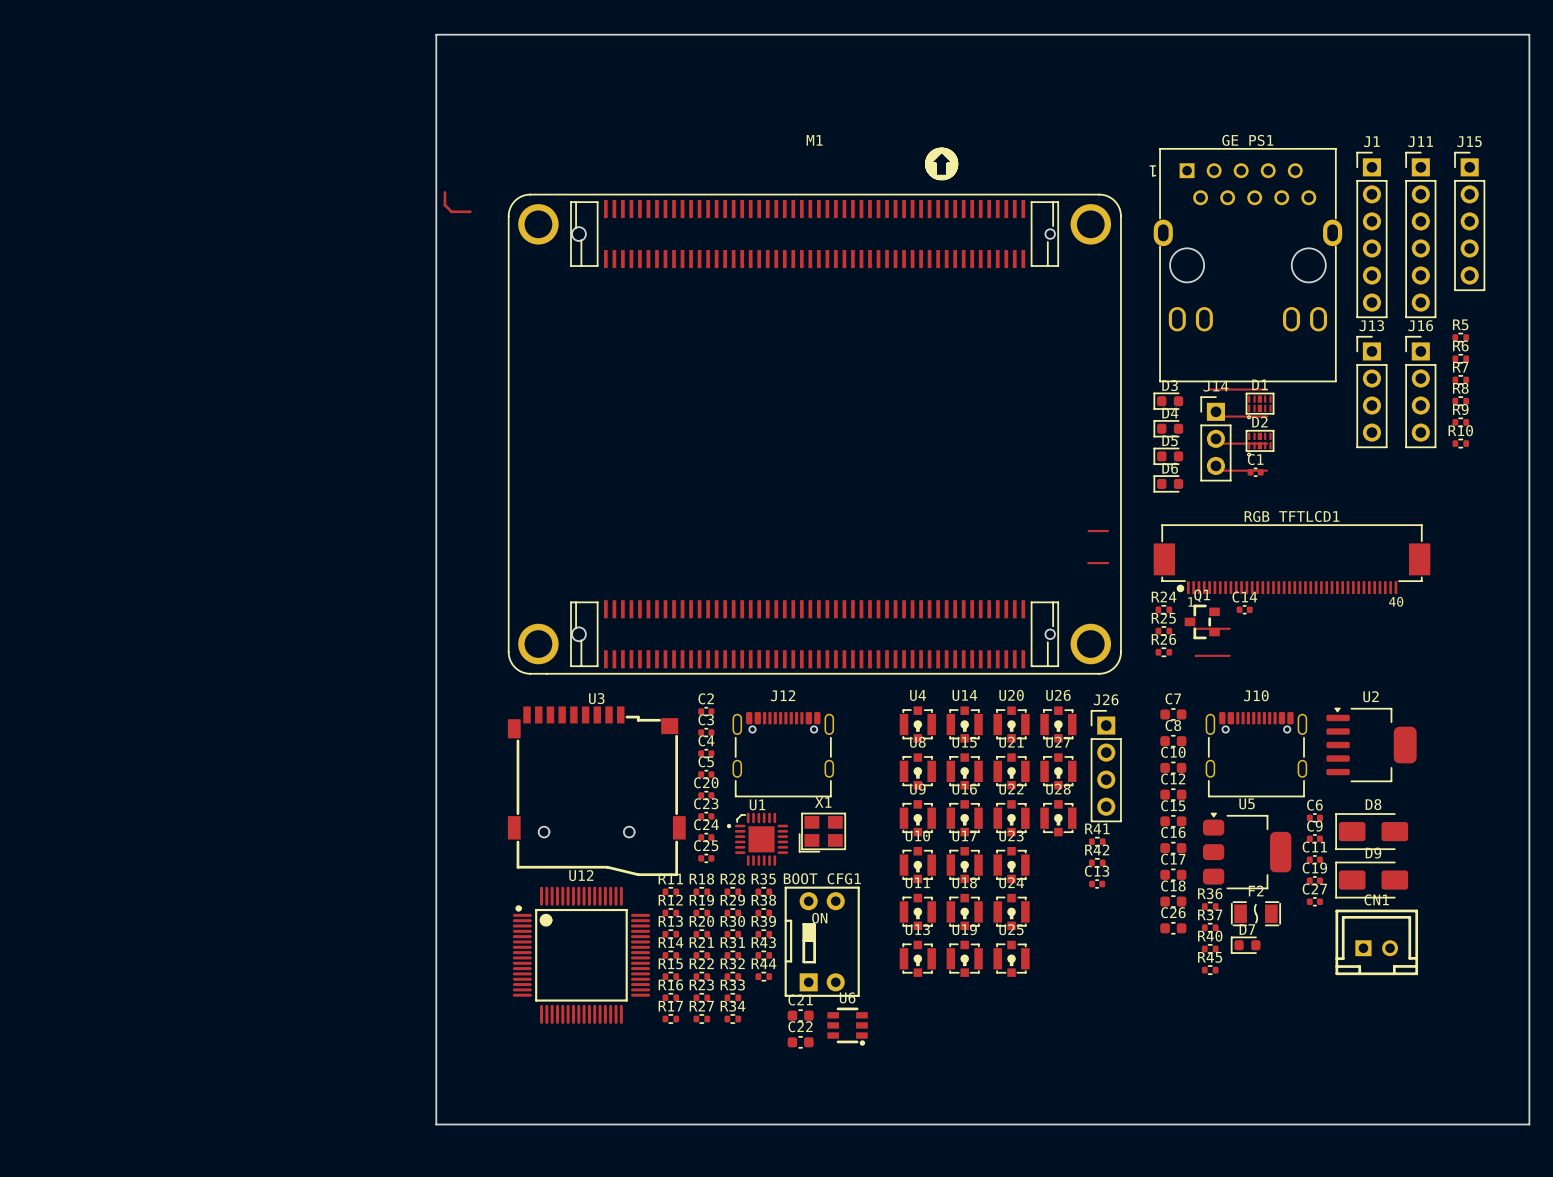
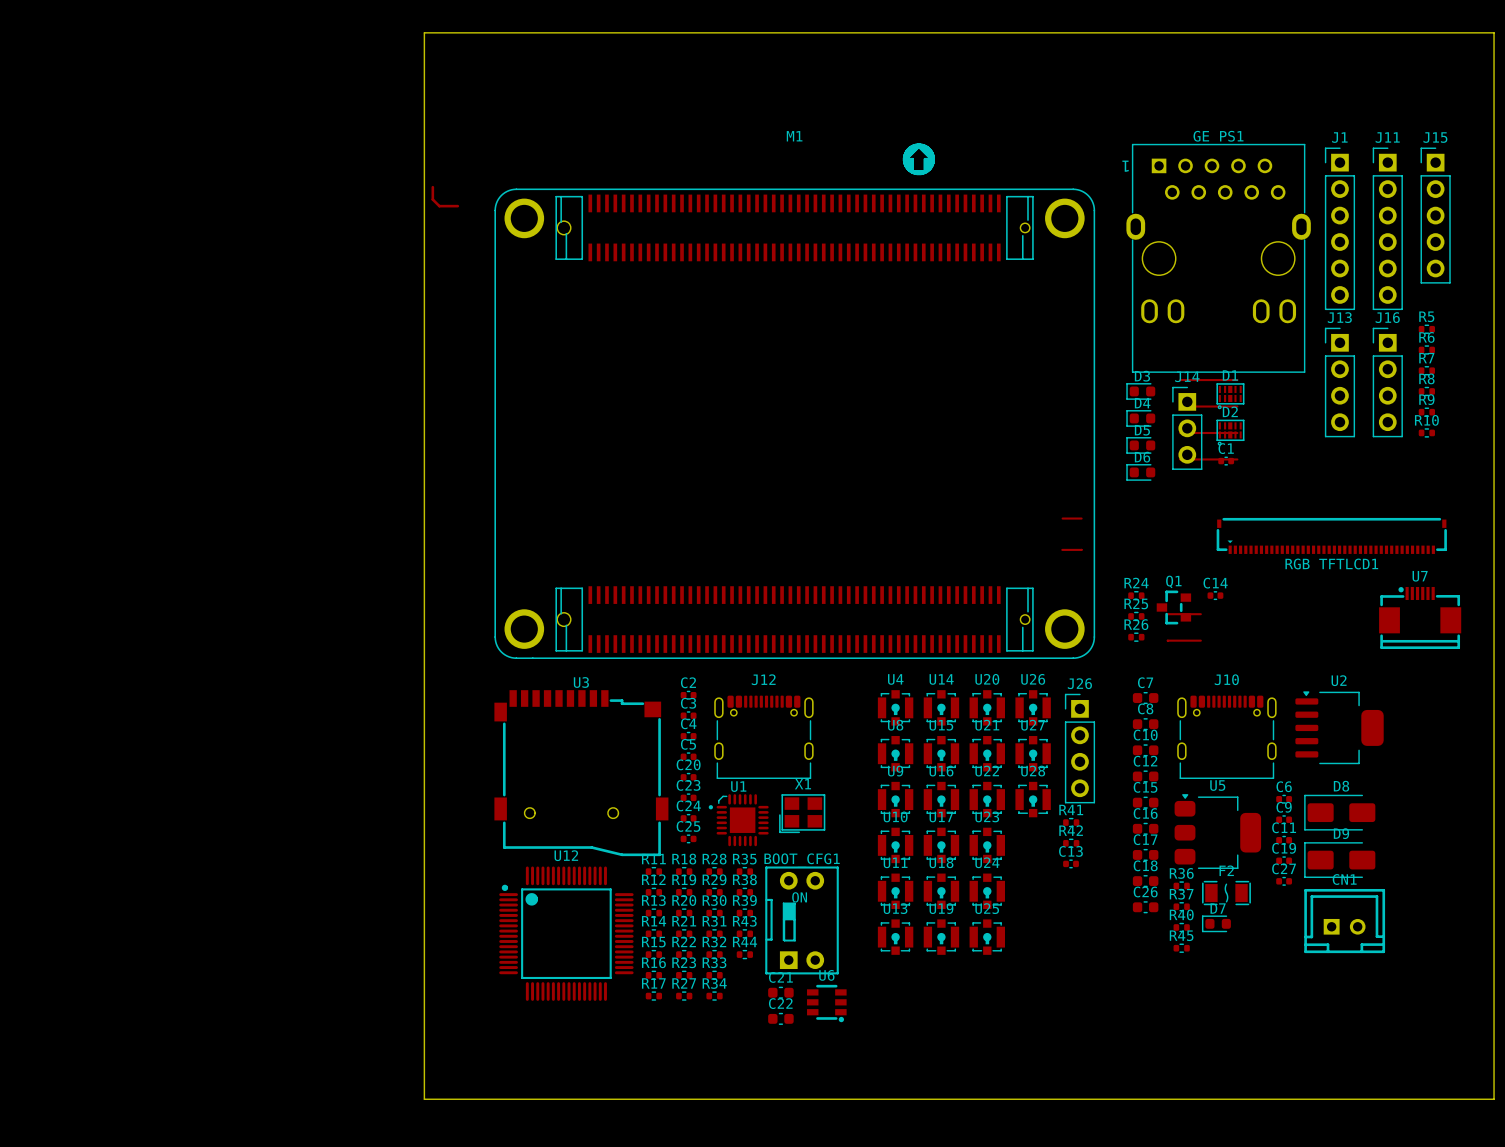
RGB TFTLCD1 name position: RGB TFTLCD1 (1292, 516) -> RGB TFTLCD1 (1331, 563)
RGB TFTLCD1 footprint: [1153, 524, 1431, 595] -> [1216, 517, 1447, 554]
U7: none -> (1420, 617)

